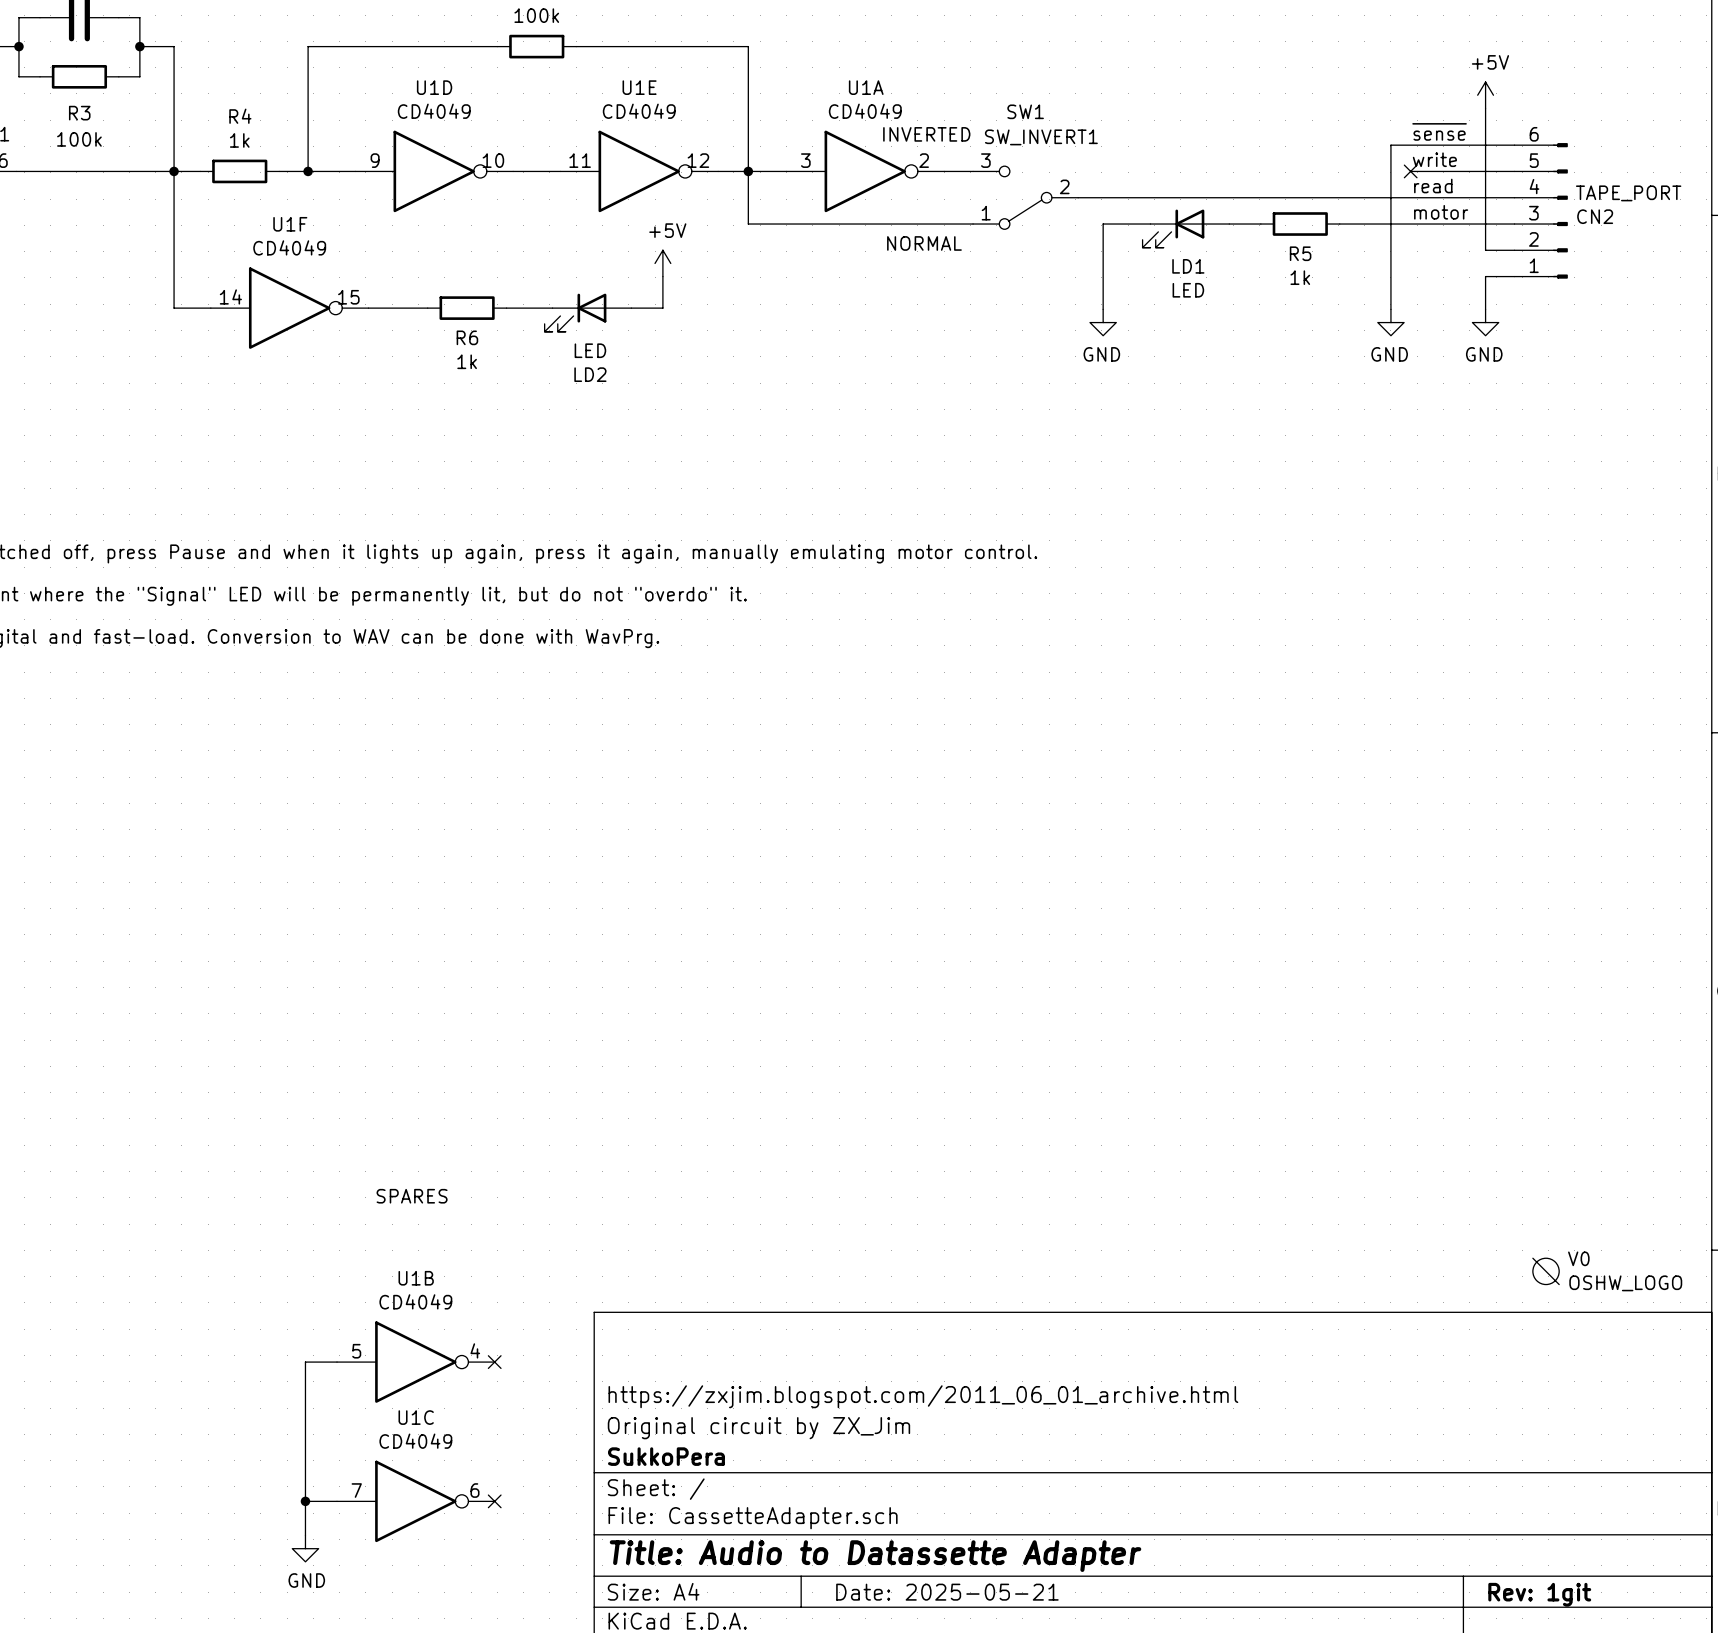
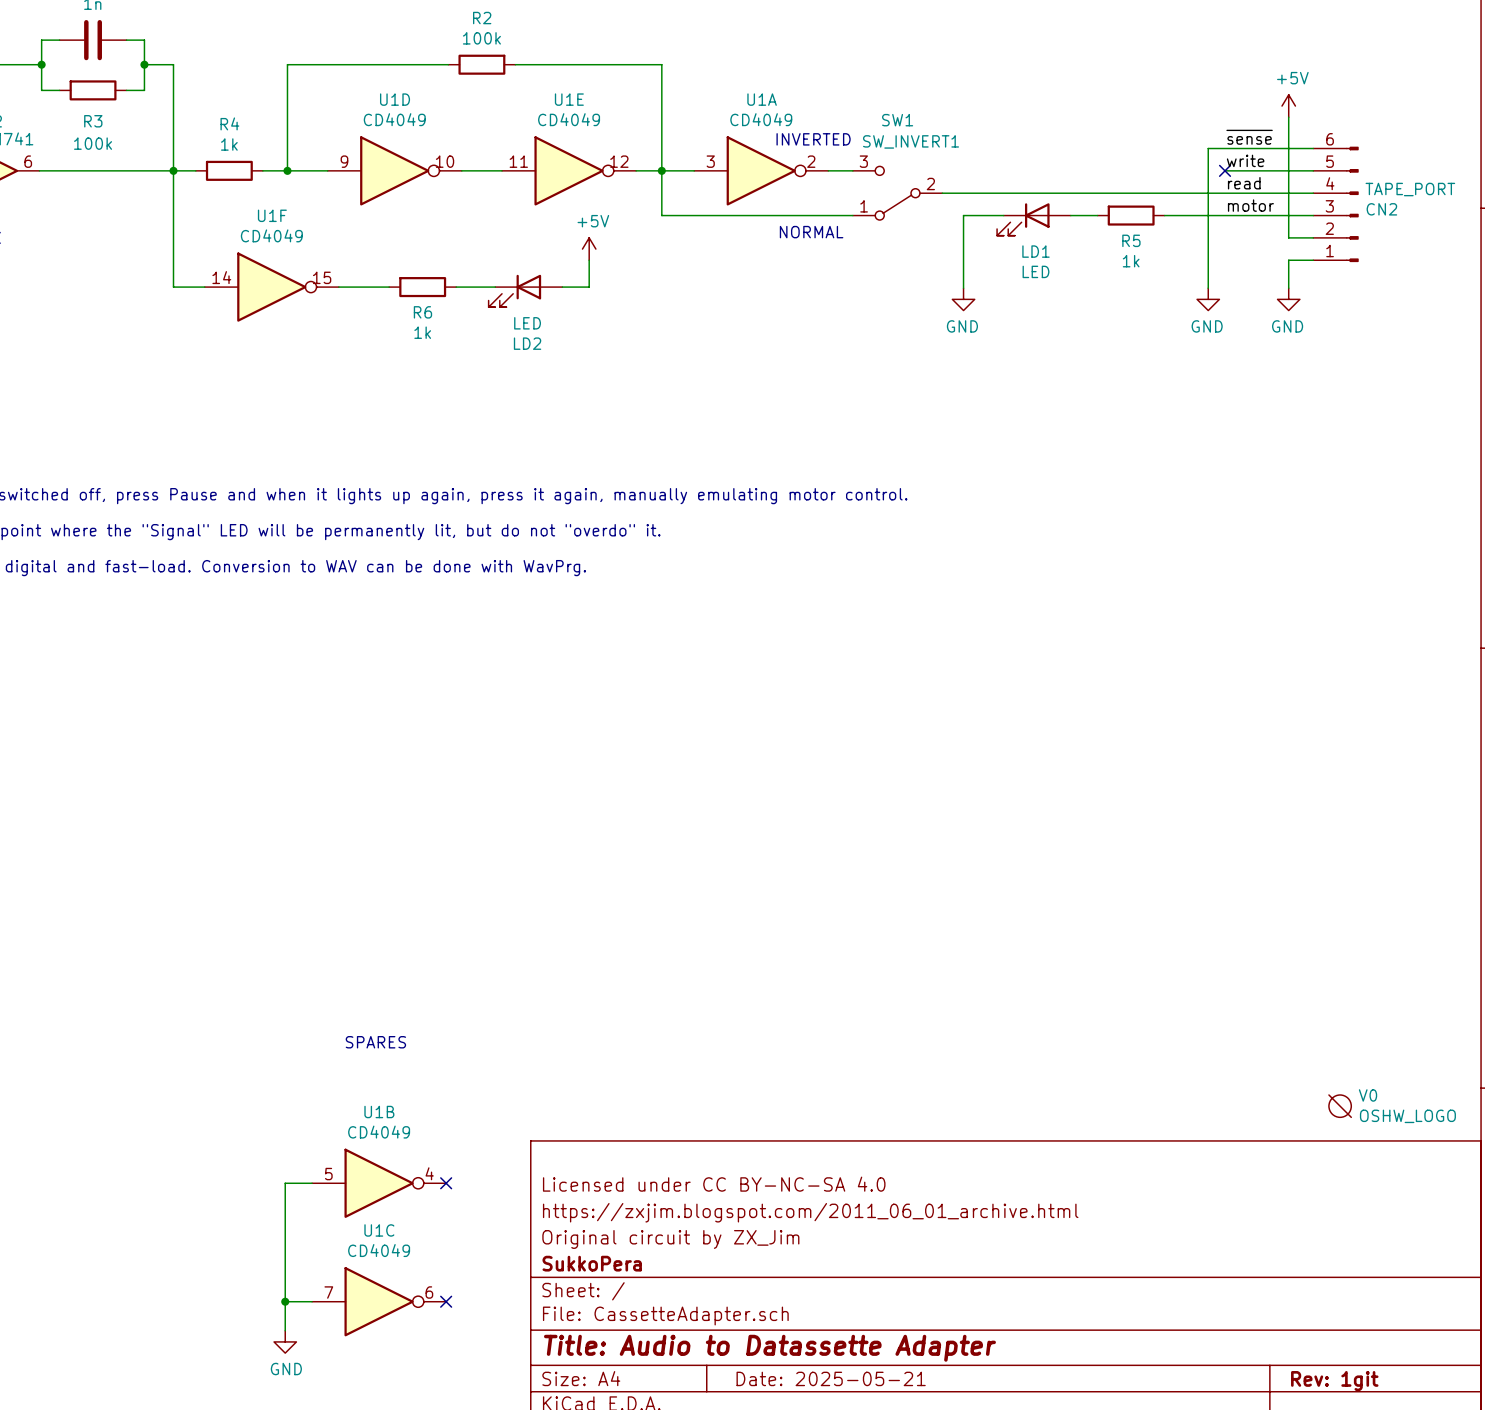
title block: none -> Licensed under CC BY-NC-SA 4.0 (714, 1184)

